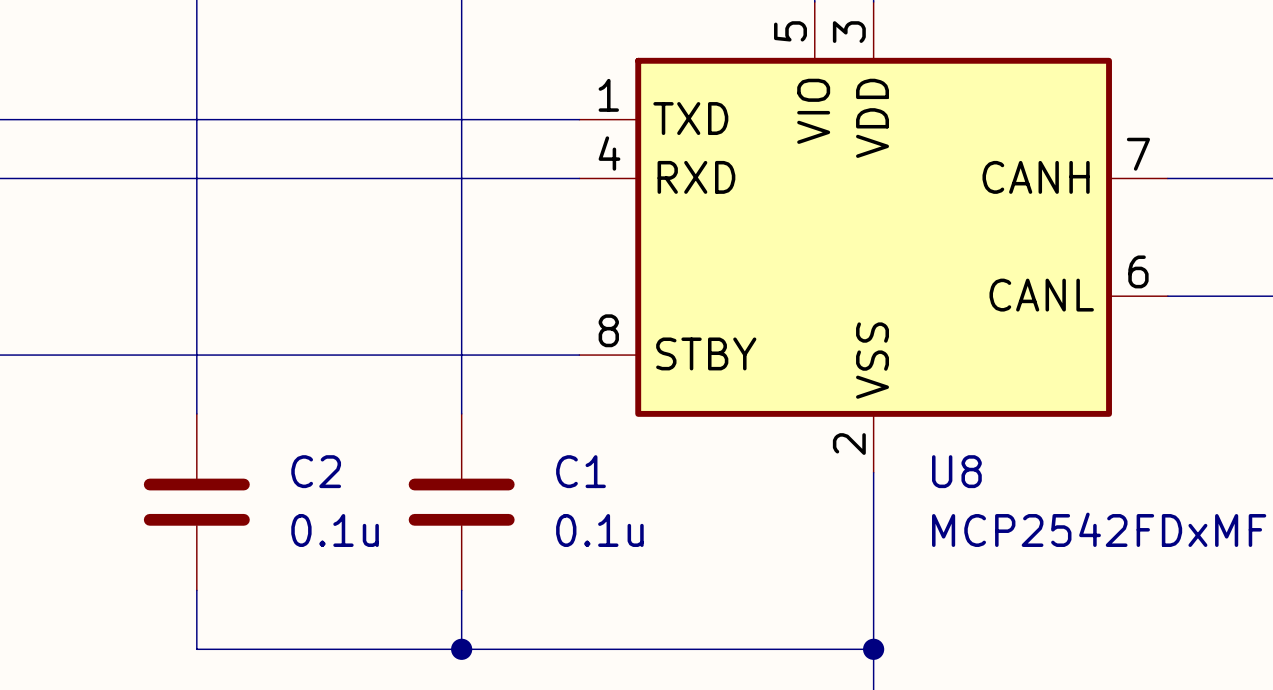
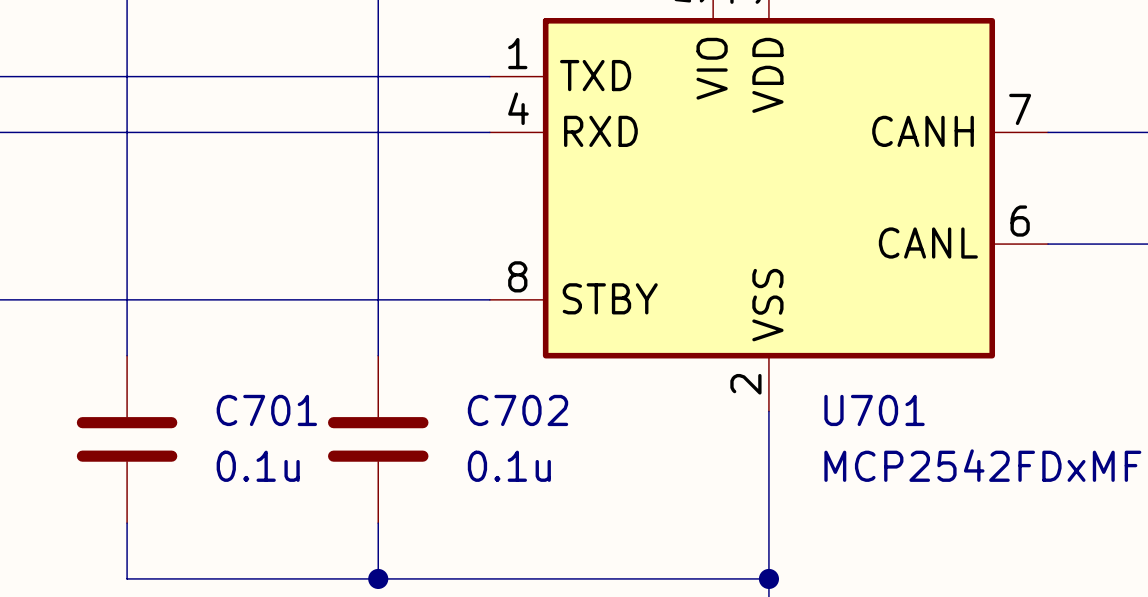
C2 name: C2 (316, 471) -> C701 (266, 410)
C1 name: C1 (580, 471) -> C702 (517, 410)
U8 name: U8 (956, 471) -> U701 (874, 410)

